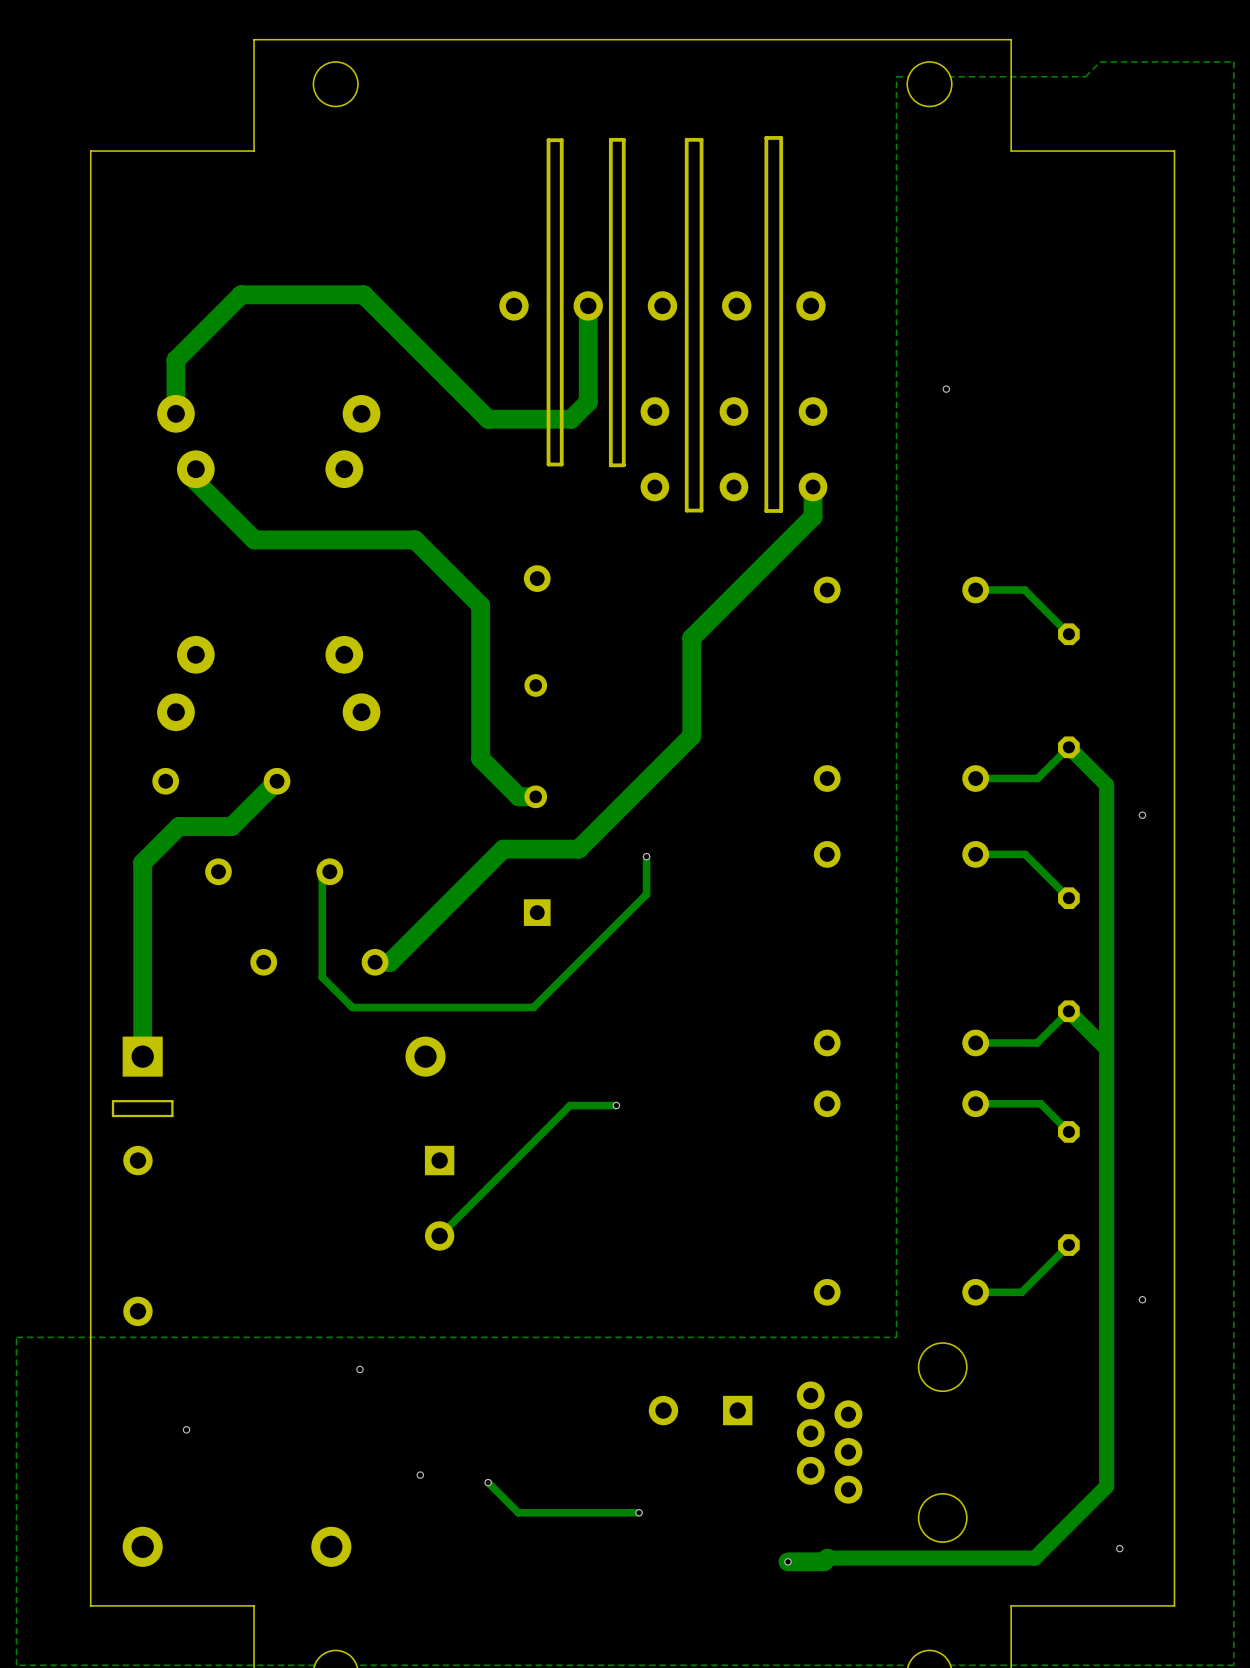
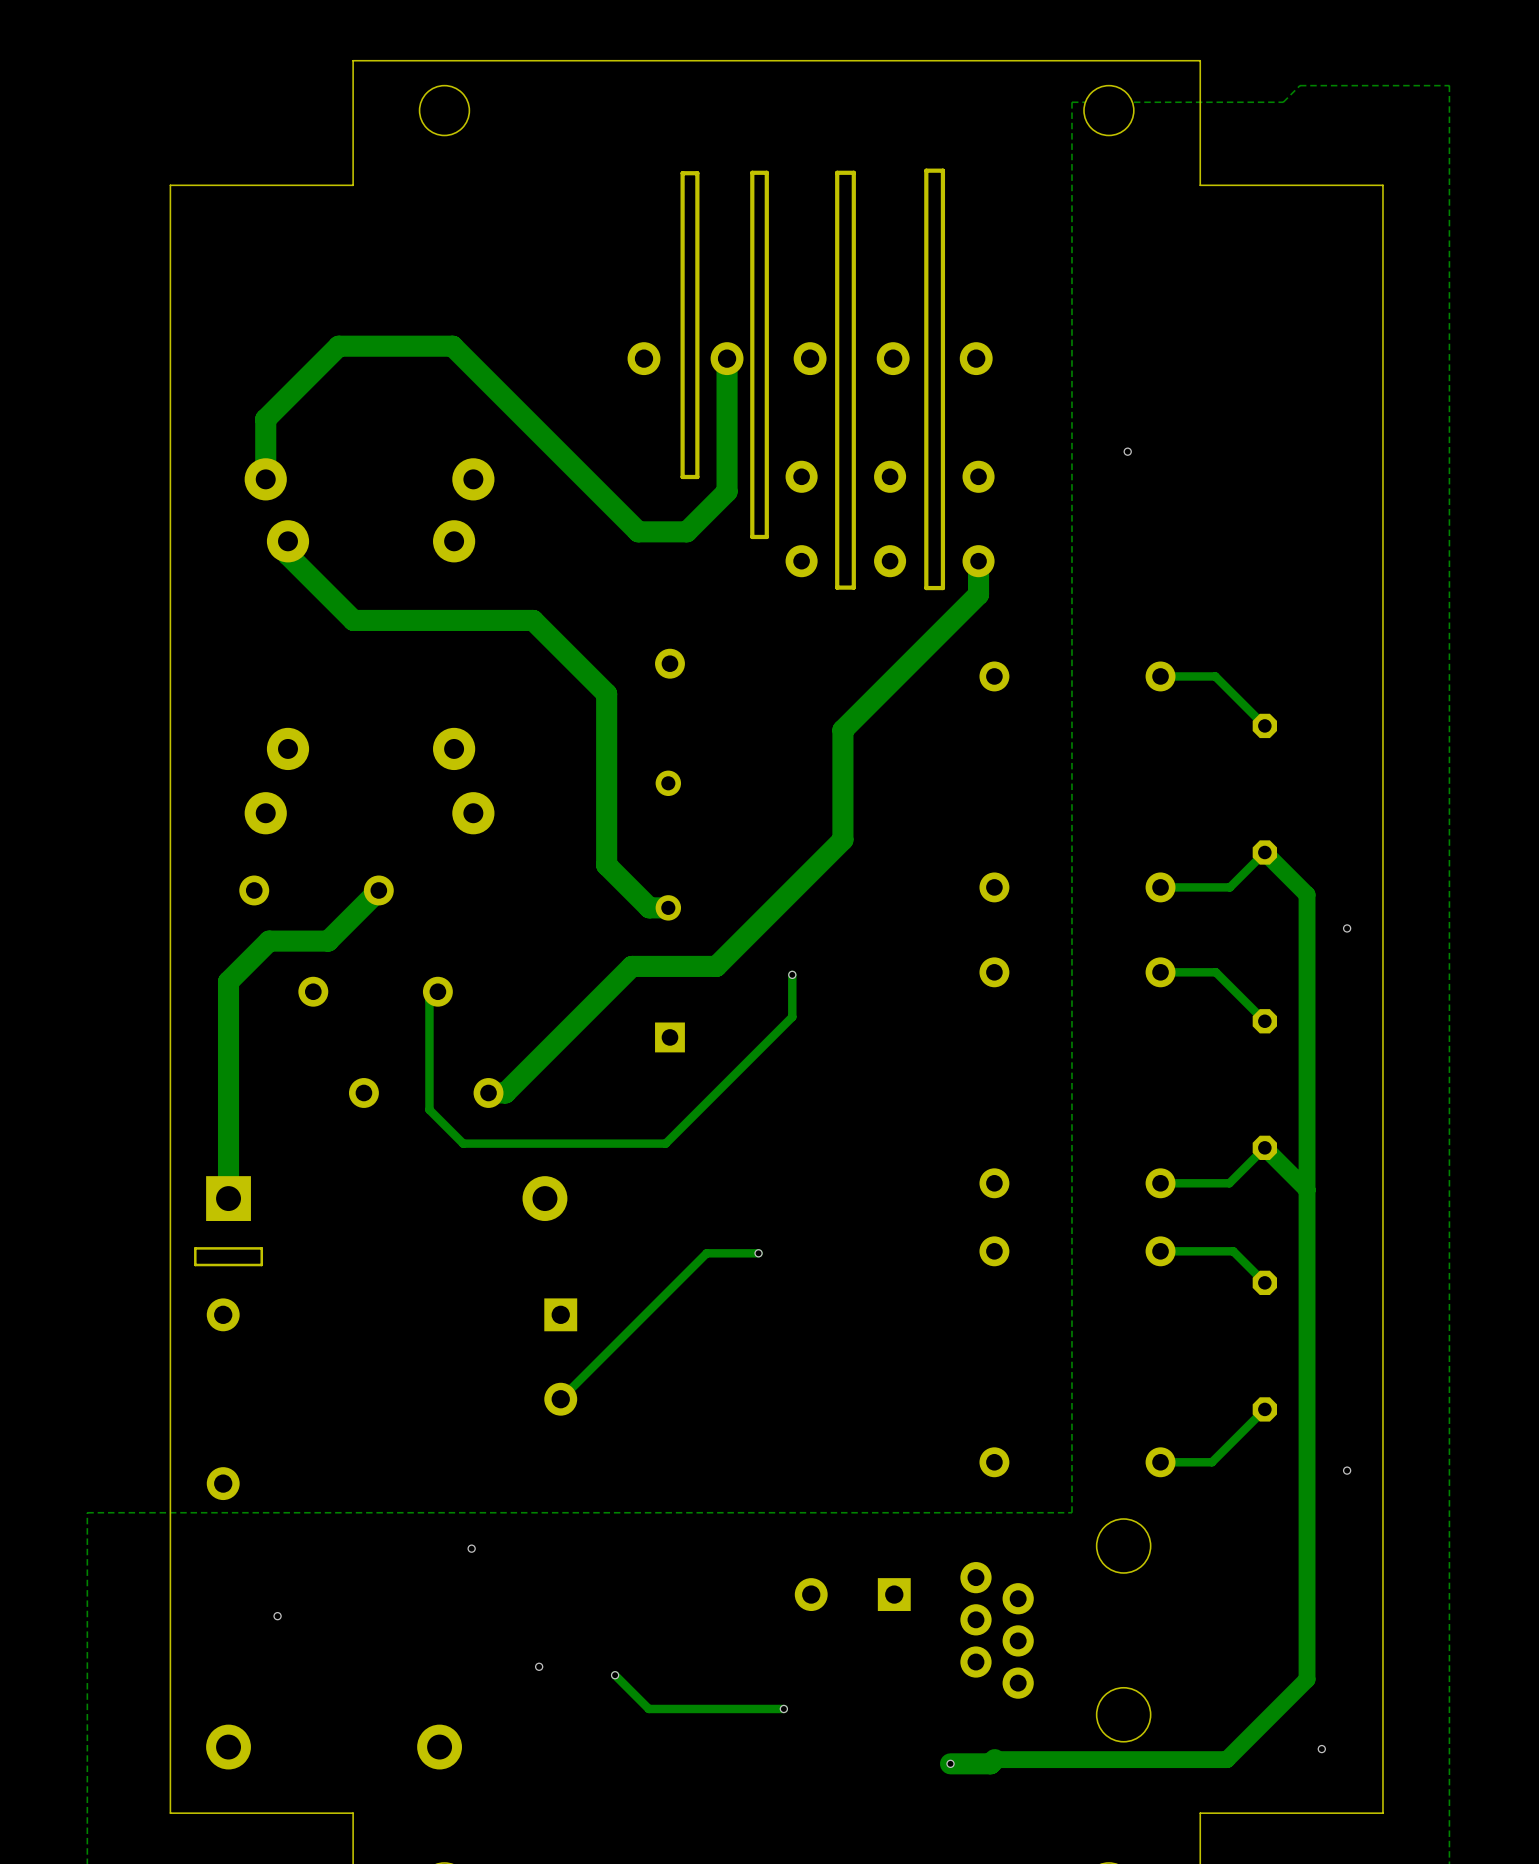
track: (343, 294) (363, 294) (488, 419) (571, 419) (588, 402) -> (452, 346) (638, 531) (686, 531) (727, 491) (727, 466)
board edge: (561, 411) (561, 464) (548, 464) (548, 411) -> (697, 476) (682, 476)

